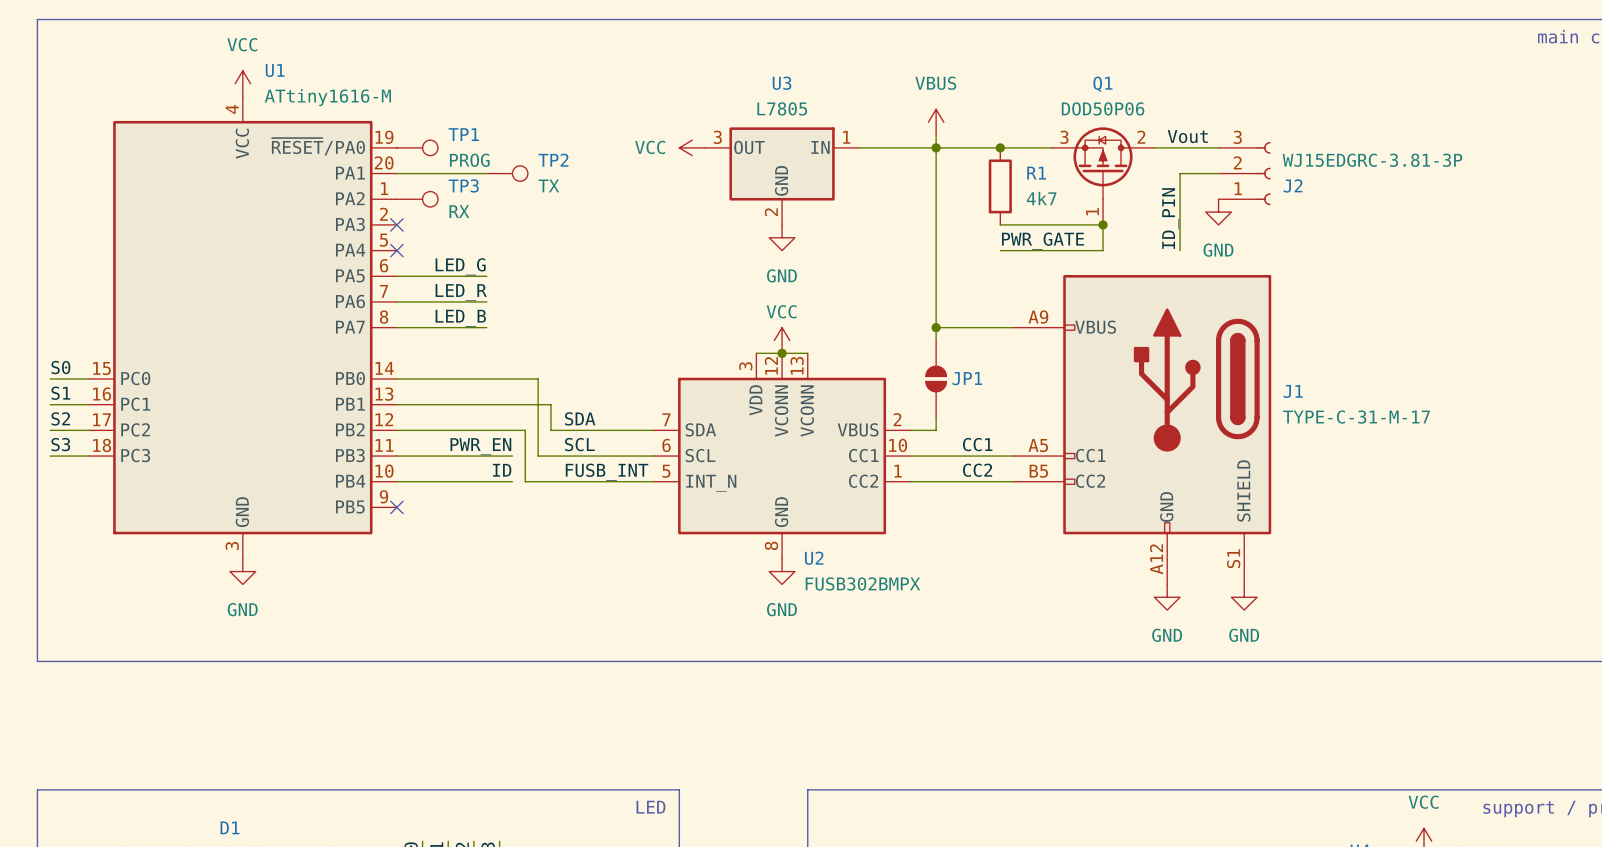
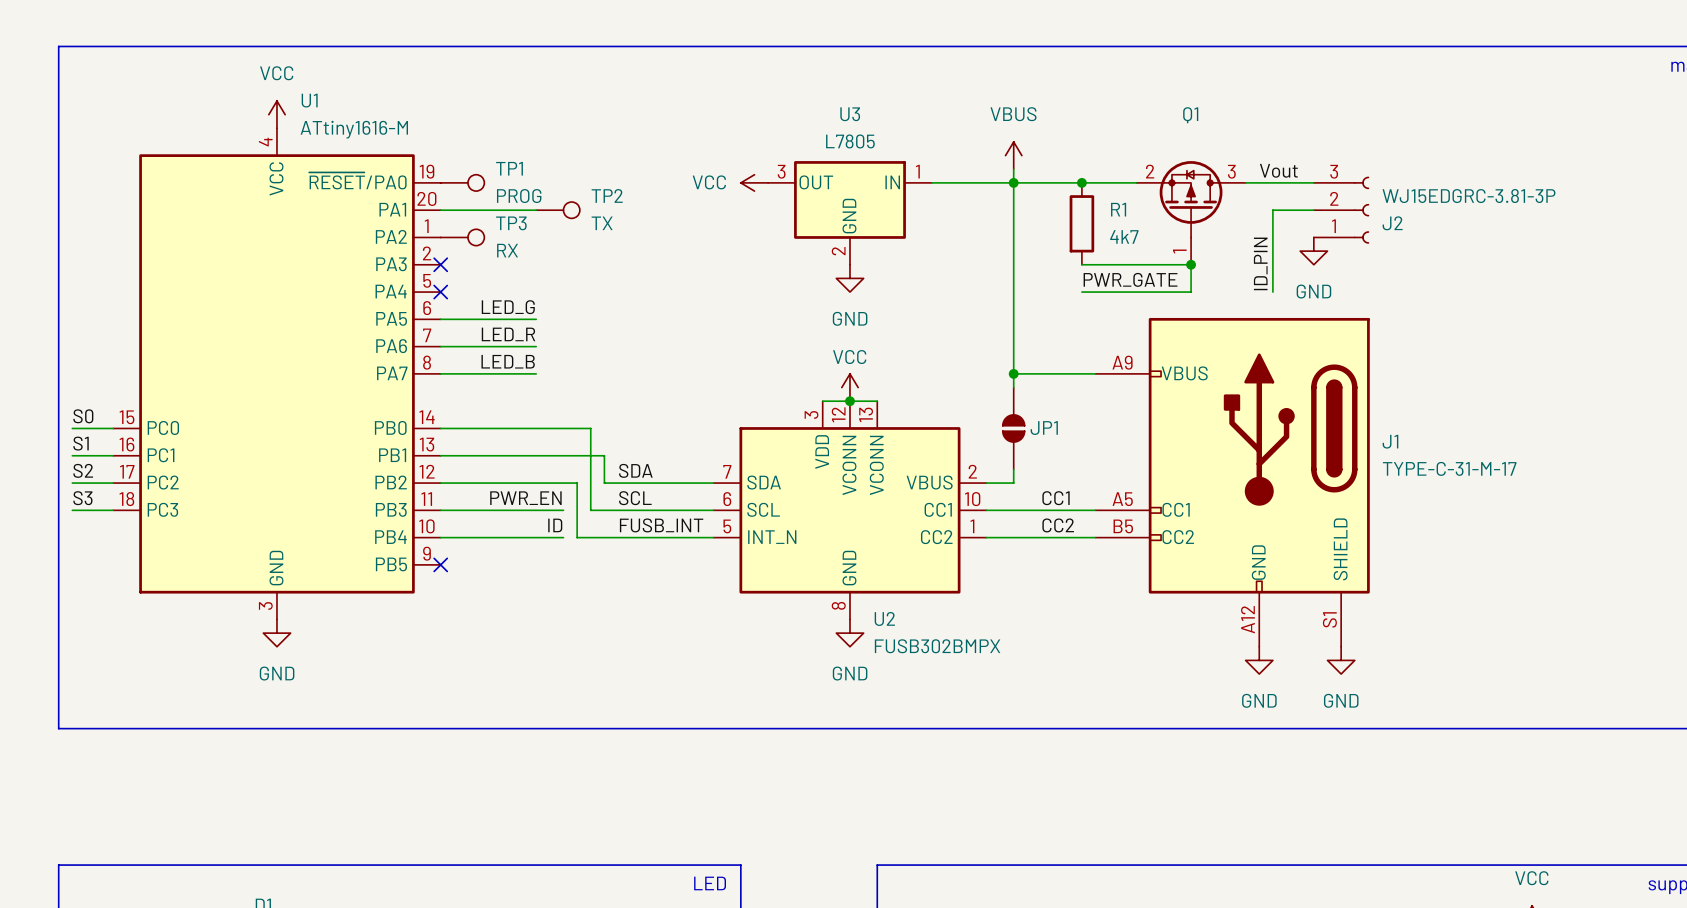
Q1 value: DOD50P06 (1103, 108) -> none
Q1 pin number: 3 (1064, 137) -> 2 (1150, 171)
Q1 pin number: 2 (1141, 137) -> 3 (1231, 171)

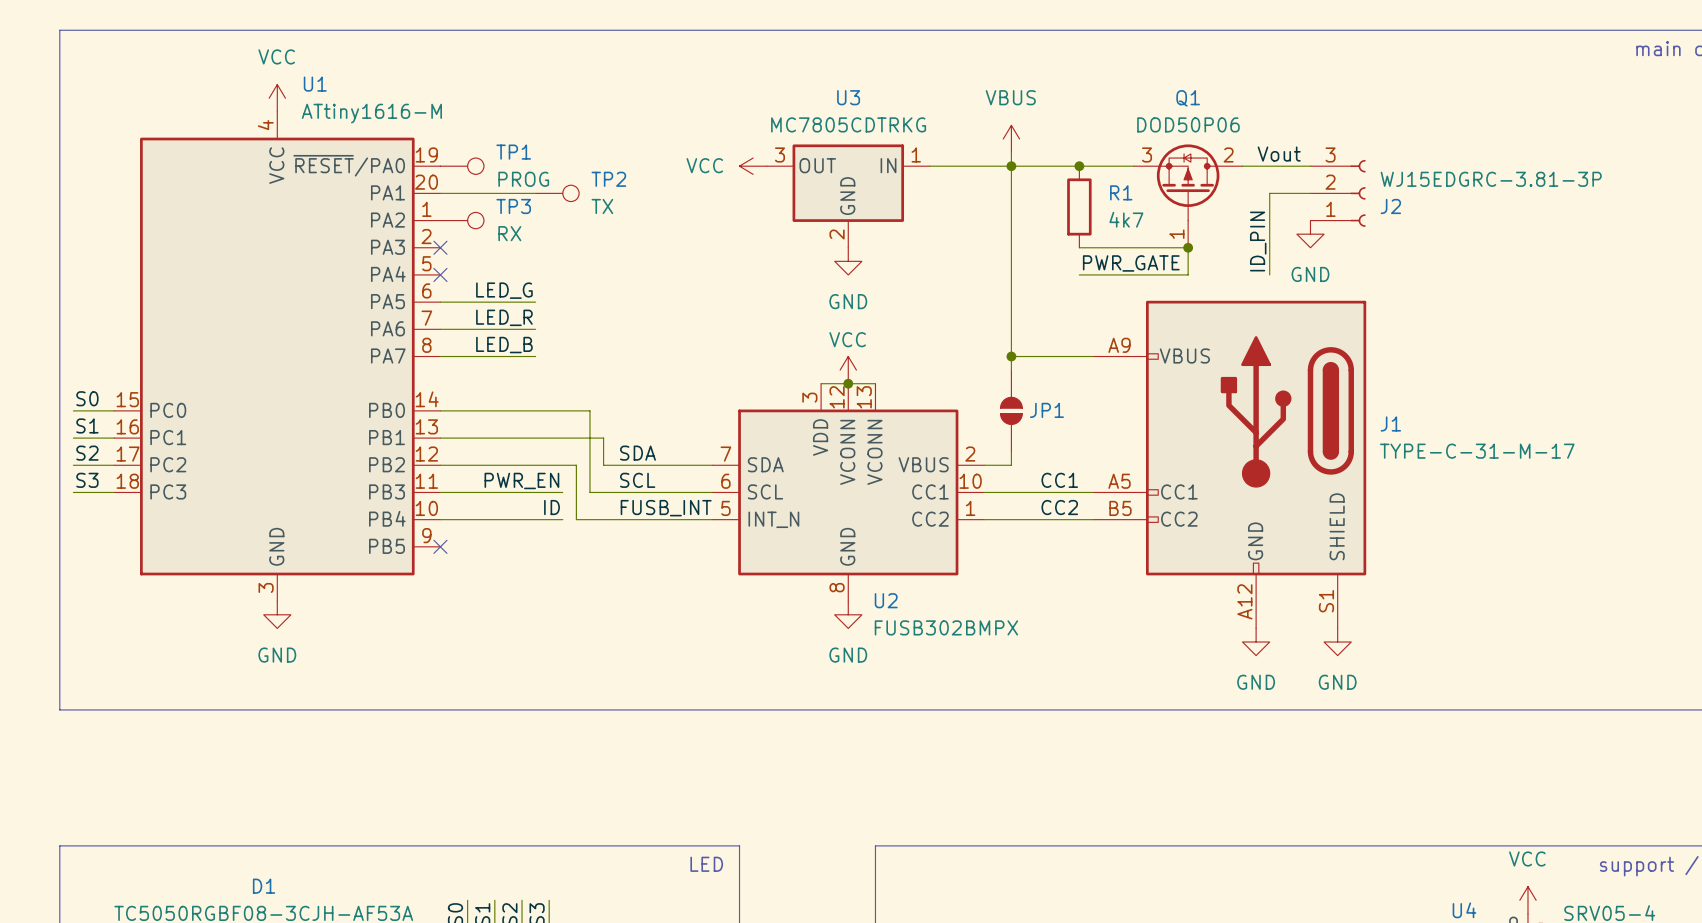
U3 value: L7805 (850, 141) -> MC7805CDTRKG (848, 124)
Q1 value: none -> DOD50P06 (1188, 124)
Q1 pin number: 2 (1150, 171) -> 3 (1147, 154)
Q1 pin number: 3 (1231, 171) -> 2 (1228, 154)

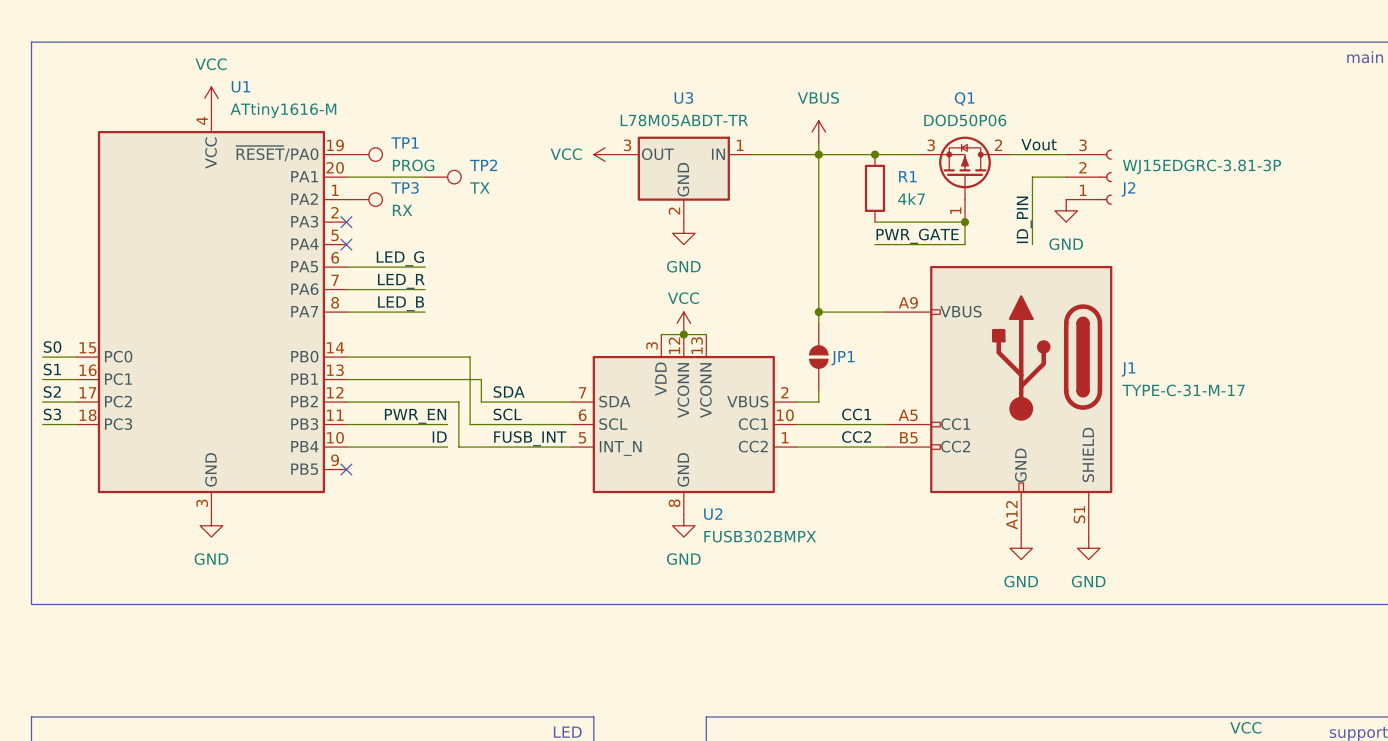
U3 value: MC7805CDTRKG (848, 124) -> L78M05ABDT-TR (684, 120)

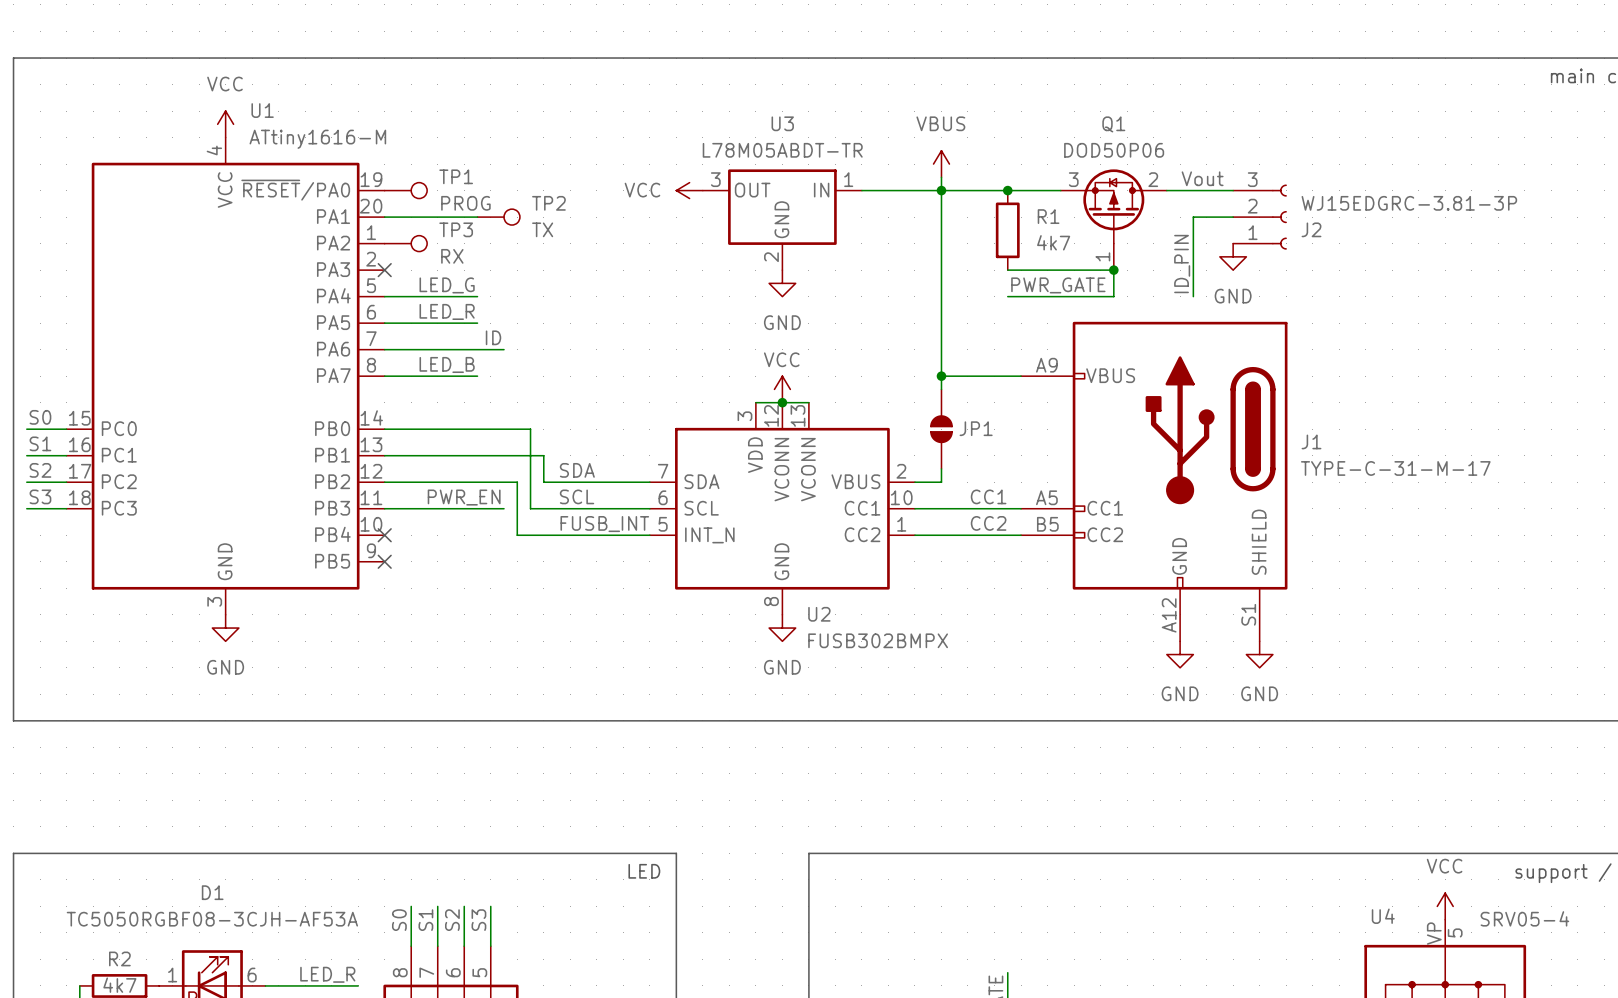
label: none -> LED_G (447, 285)
wire: none -> (384, 296) (477, 296)
no-connect mark: (346, 244) -> none
label: LED_G (400, 258) -> LED_R (447, 311)
label: LED_R (401, 281) -> none
wire: none -> (477, 349) (504, 349)
label position: ID (439, 437) -> ID (493, 337)
wire: (346, 447) (447, 447) -> none
no-connect mark: none -> (384, 535)

